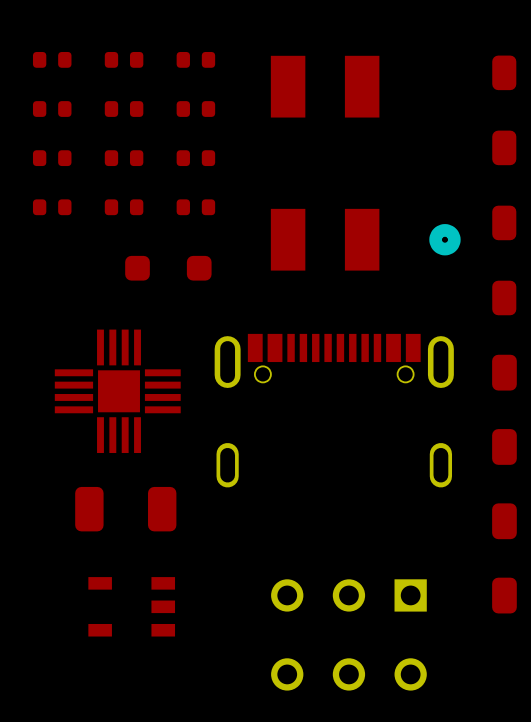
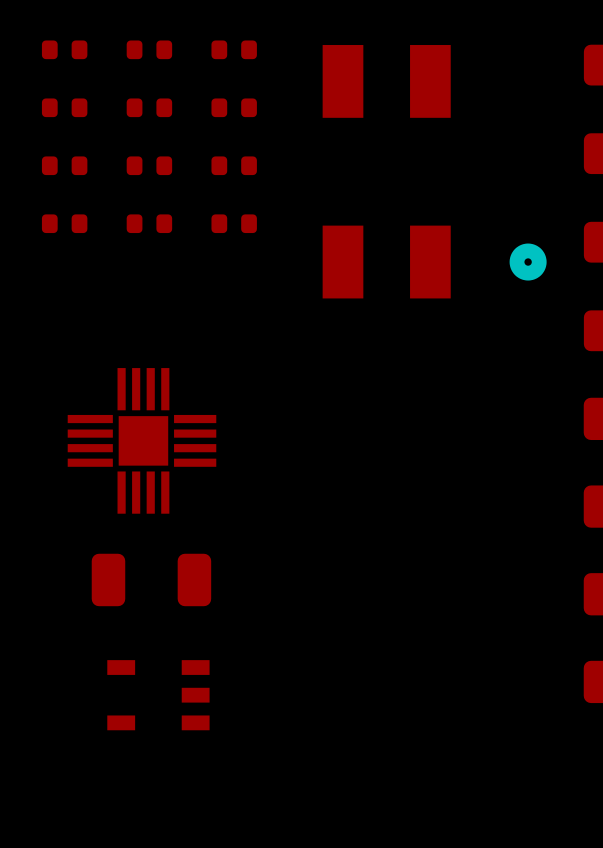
part: (168, 268) -> none
part: (334, 410) -> none
part: (348, 634) -> none

